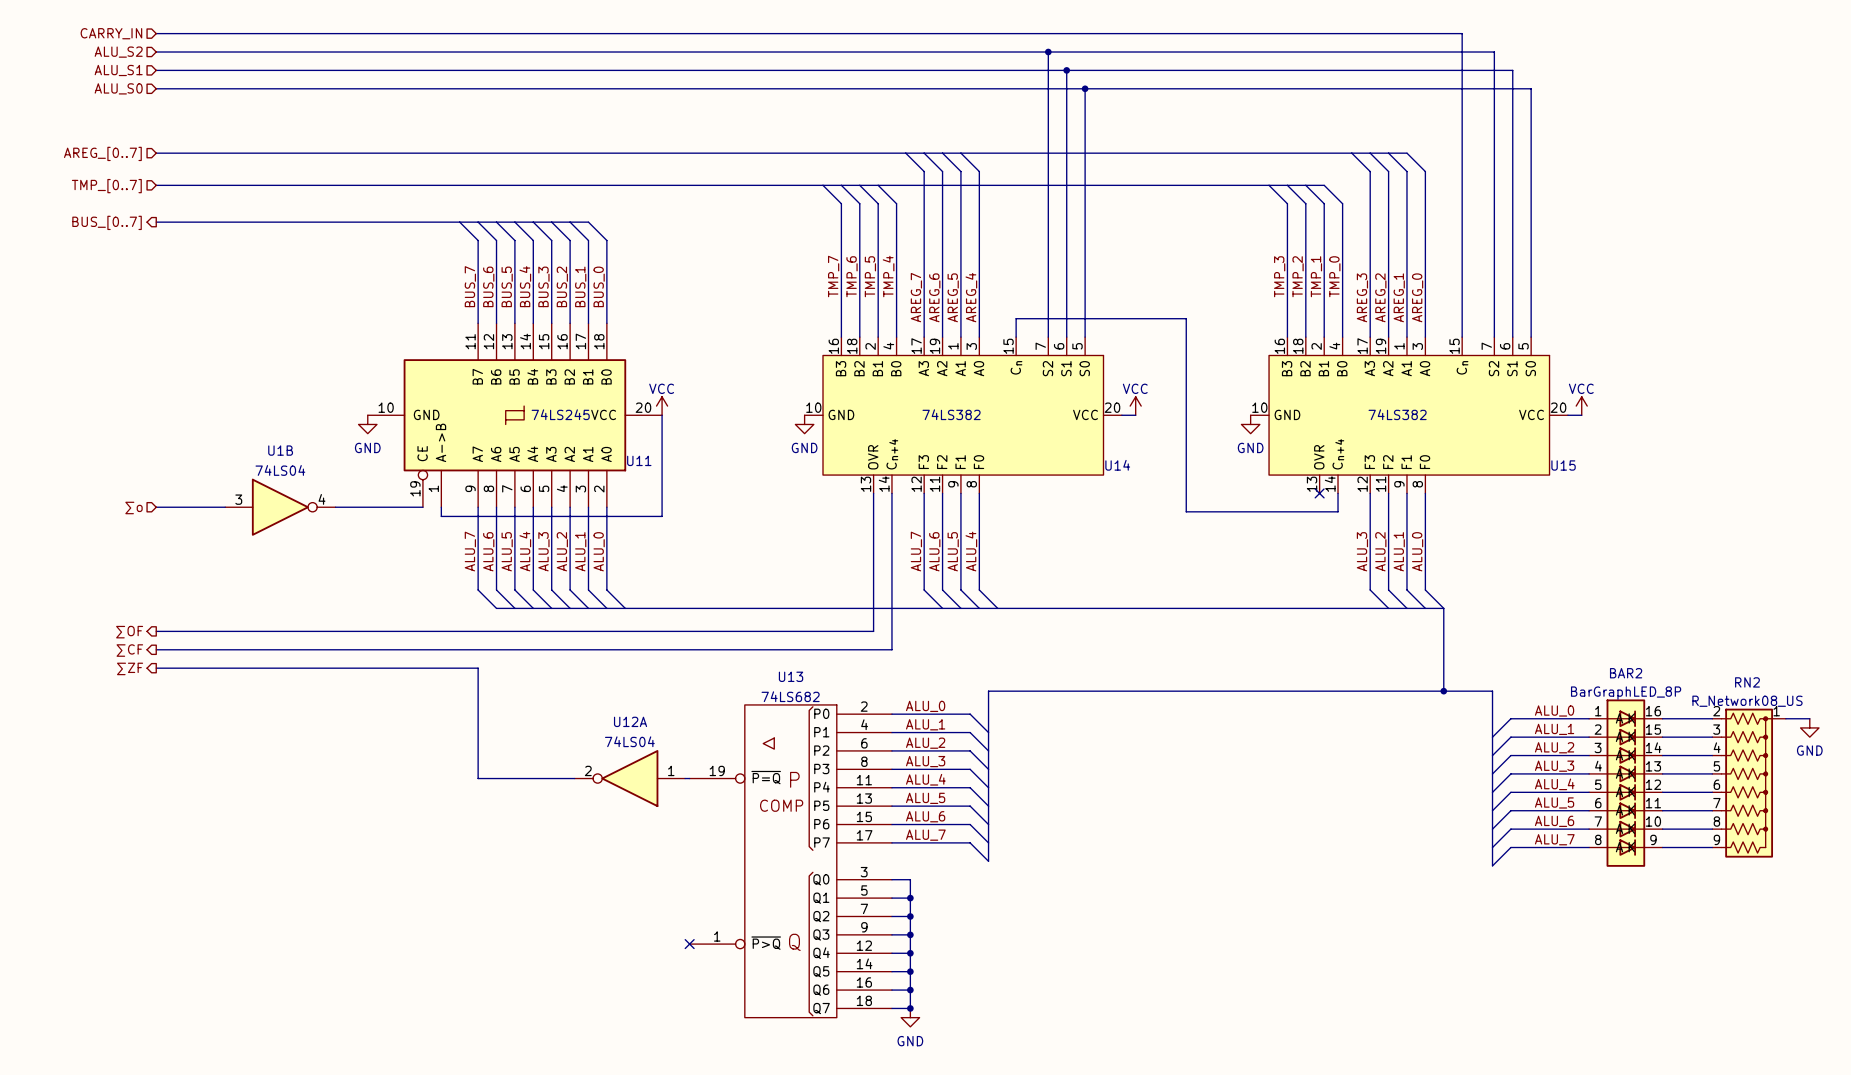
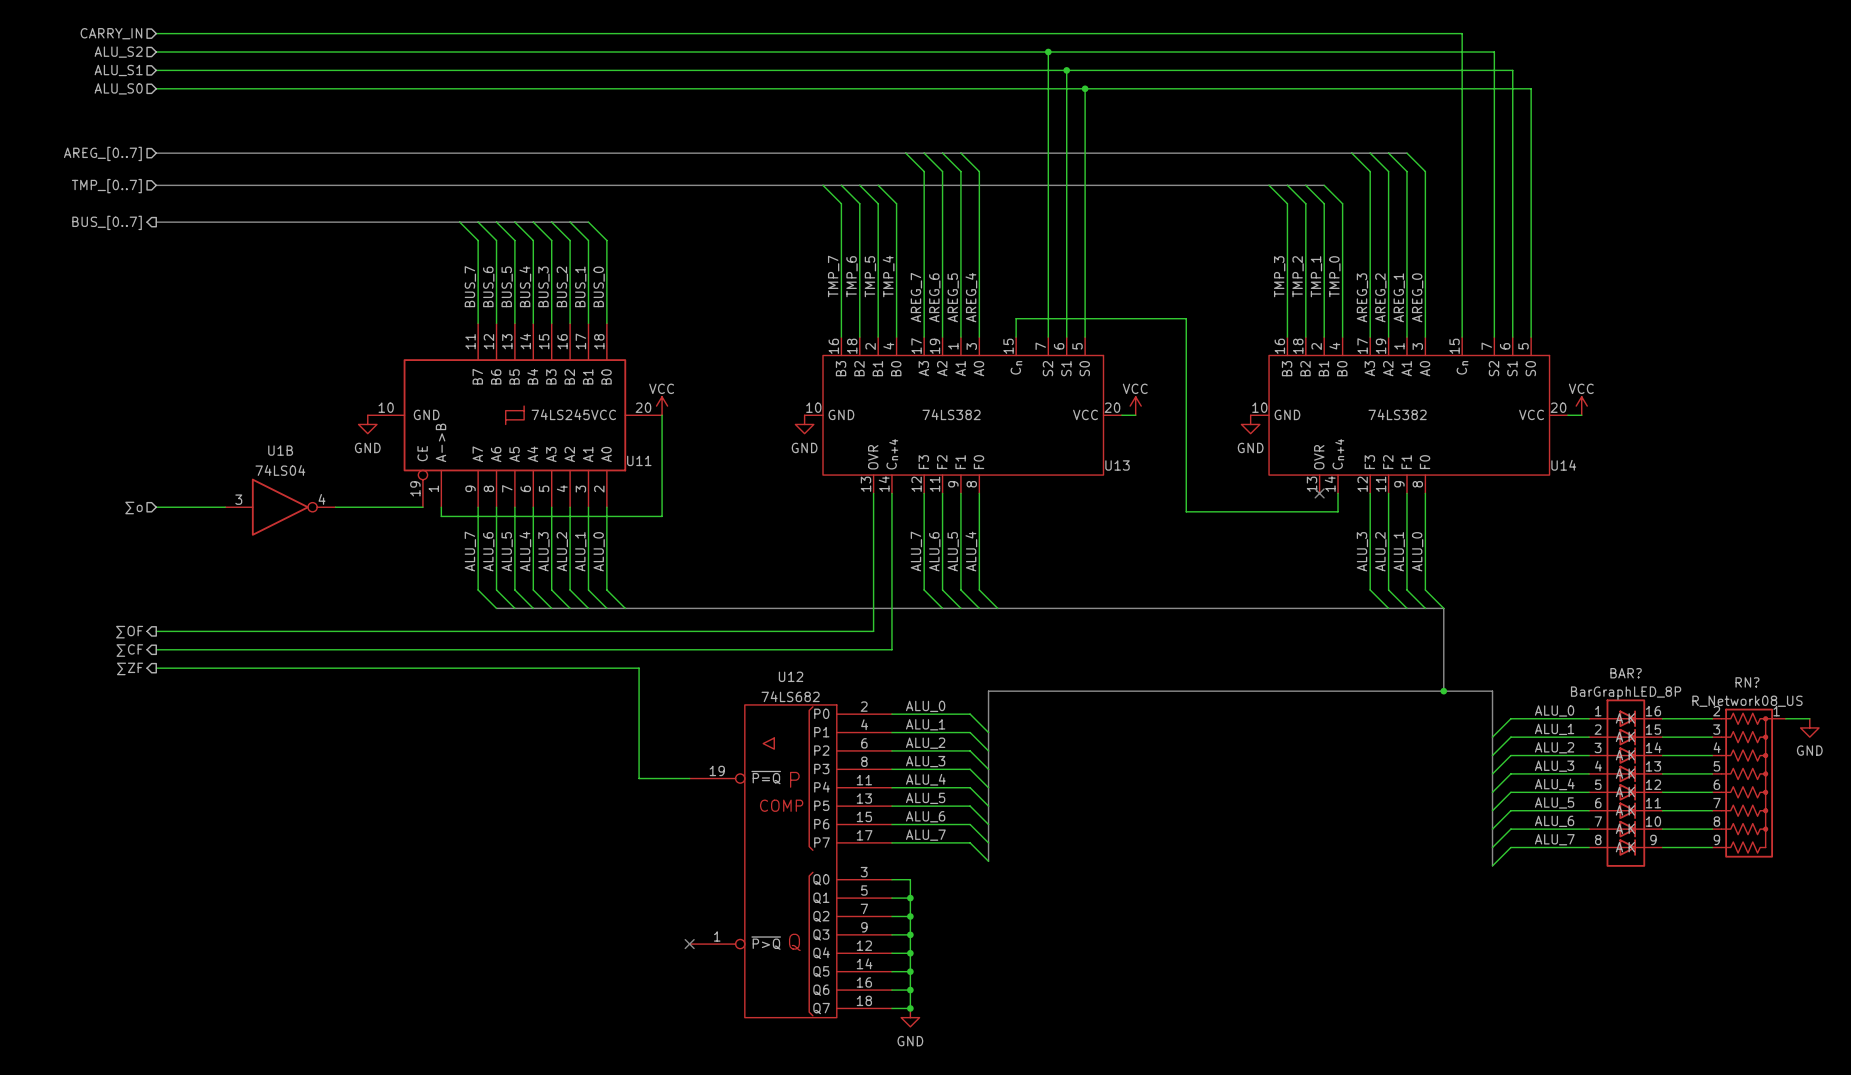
U14 name: U14 (1117, 465) -> U13 (1117, 465)
U15 name: U15 (1563, 465) -> U14 (1563, 465)
wire: (478, 668) (478, 778) (574, 778) -> (478, 668) (639, 668) (639, 778) (685, 778)
BAR2 name: BAR2 (1626, 673) -> BAR? (1626, 673)
U13 name: U13 (791, 676) -> U12 (791, 676)
RN2 name: RN2 (1747, 682) -> RN? (1747, 682)
U12A: 74LS04 (629, 778) -> none

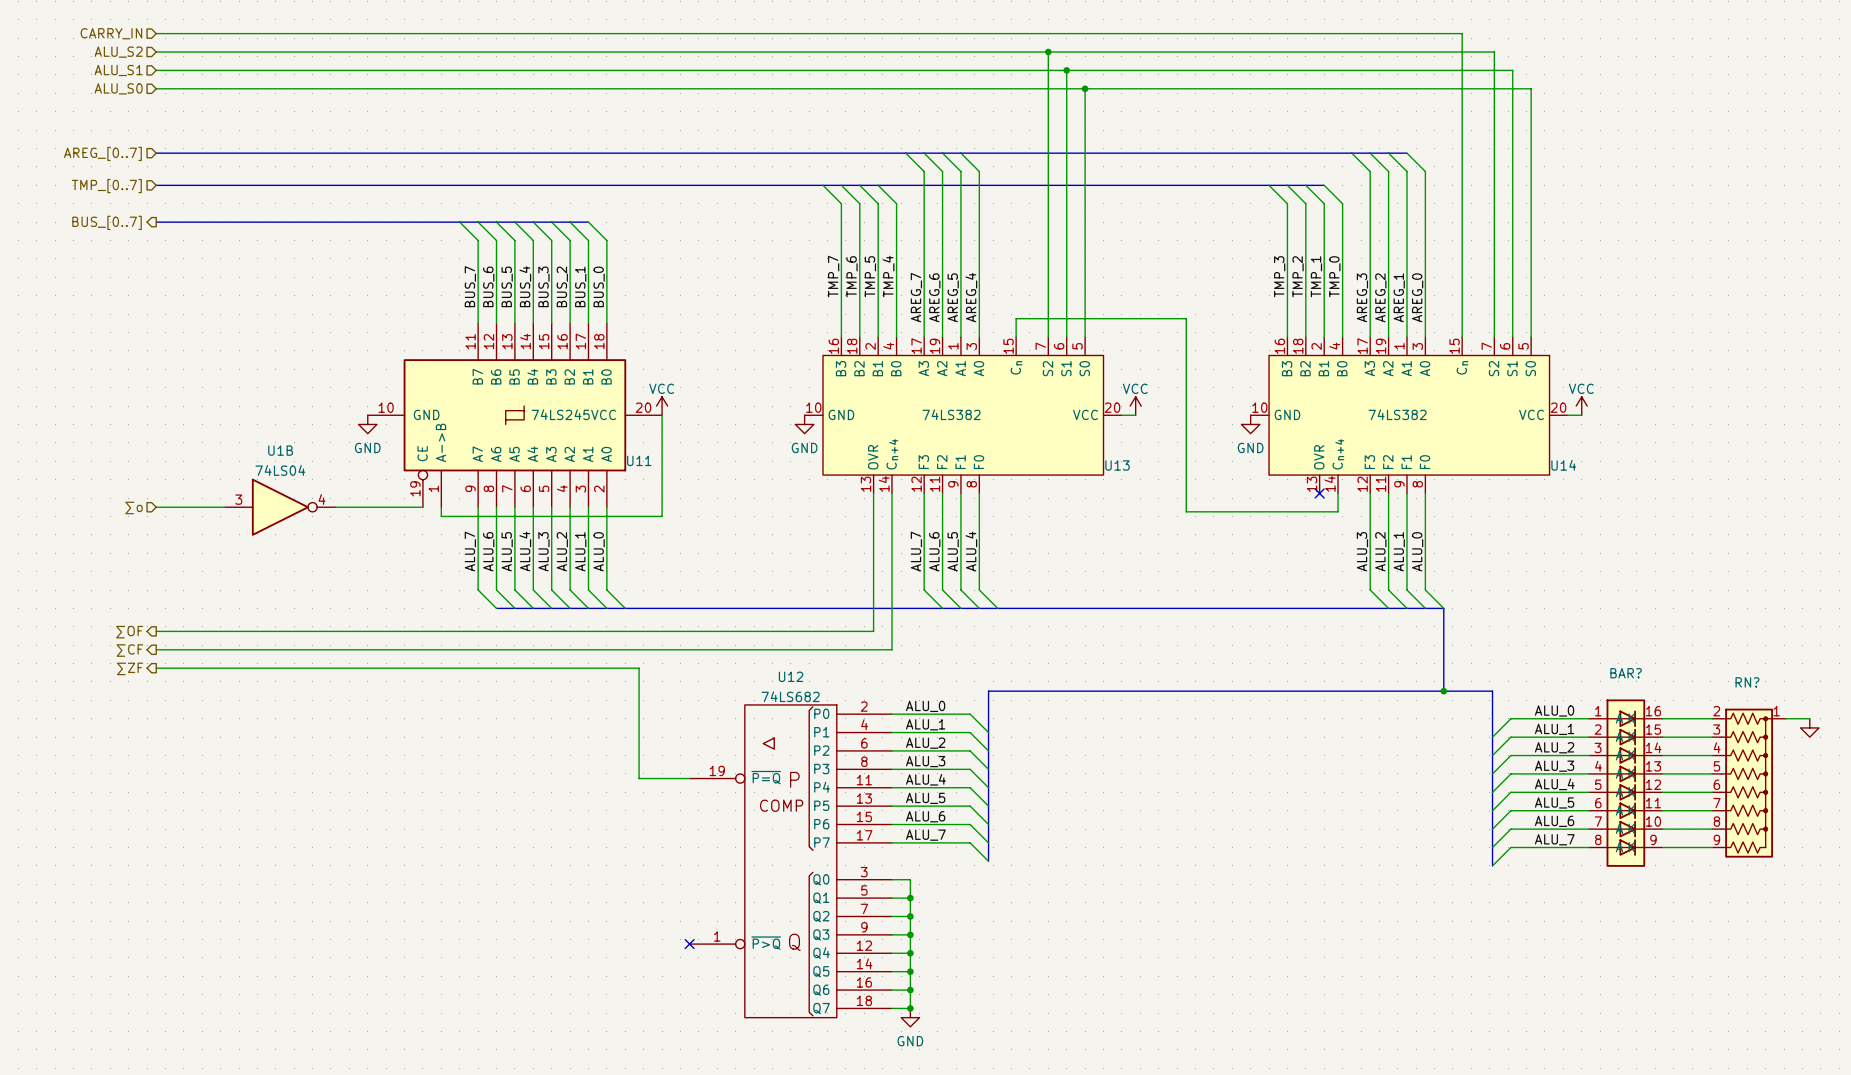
BAR? value: BarGraphLED_8P (1626, 693) -> none
RN? value: R_Network08_US (1747, 701) -> none
power symbol text: GND (1809, 750) -> none

